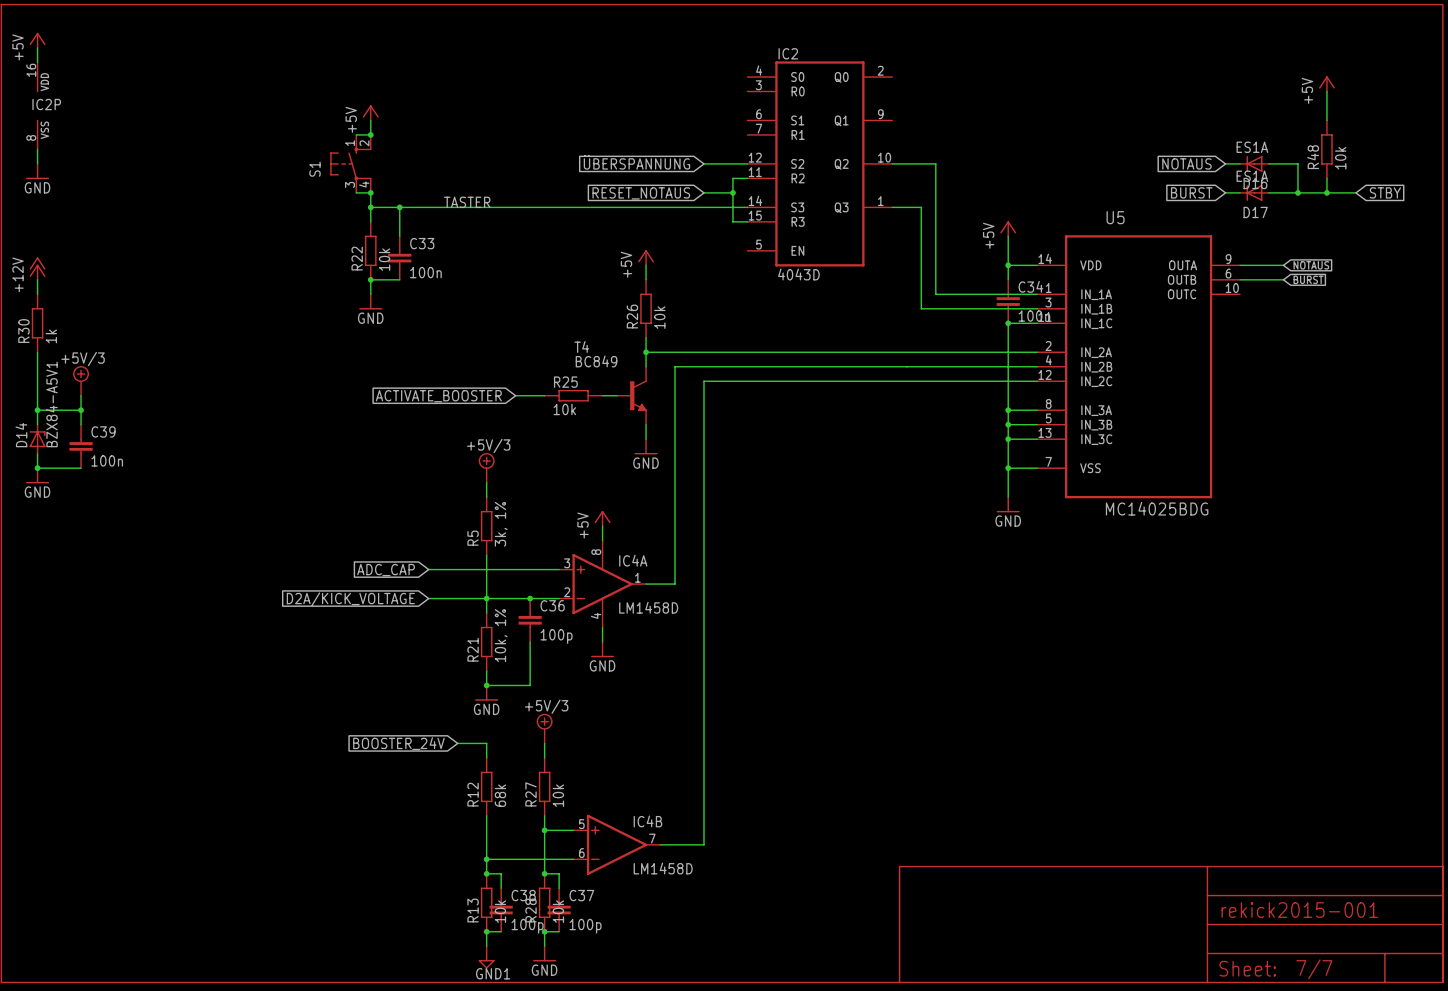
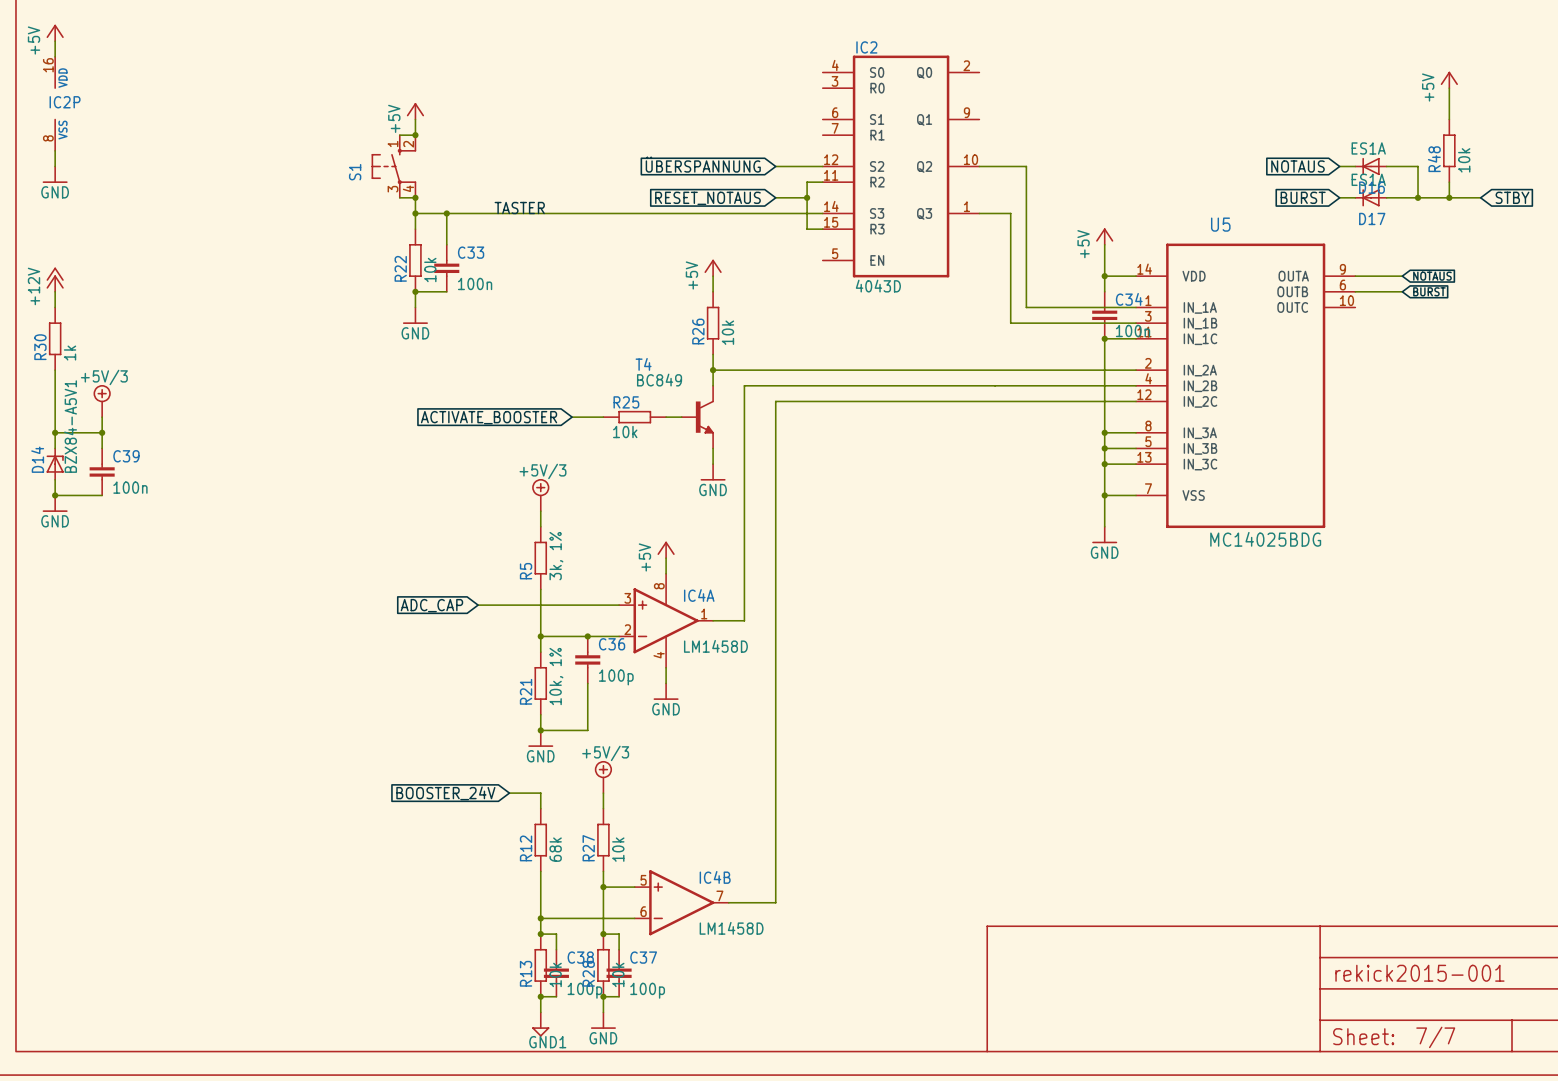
wire: (428, 598) (486, 598) -> none
global label: D2A/KICK_VOLTAGE (350, 599) -> none

